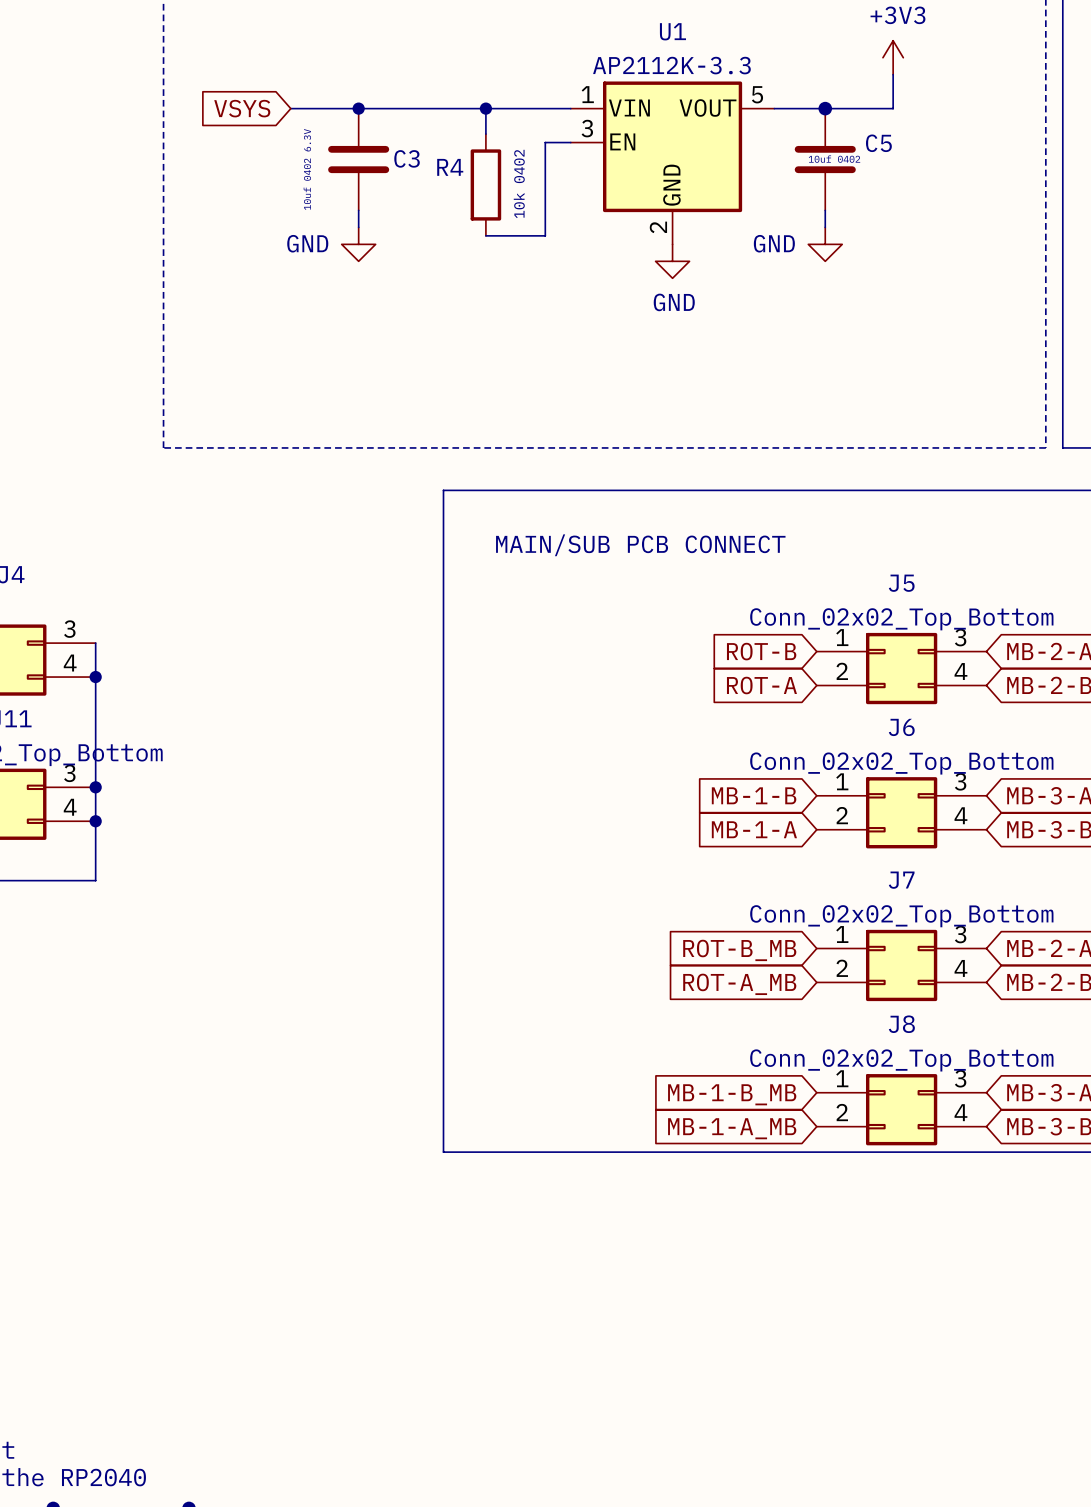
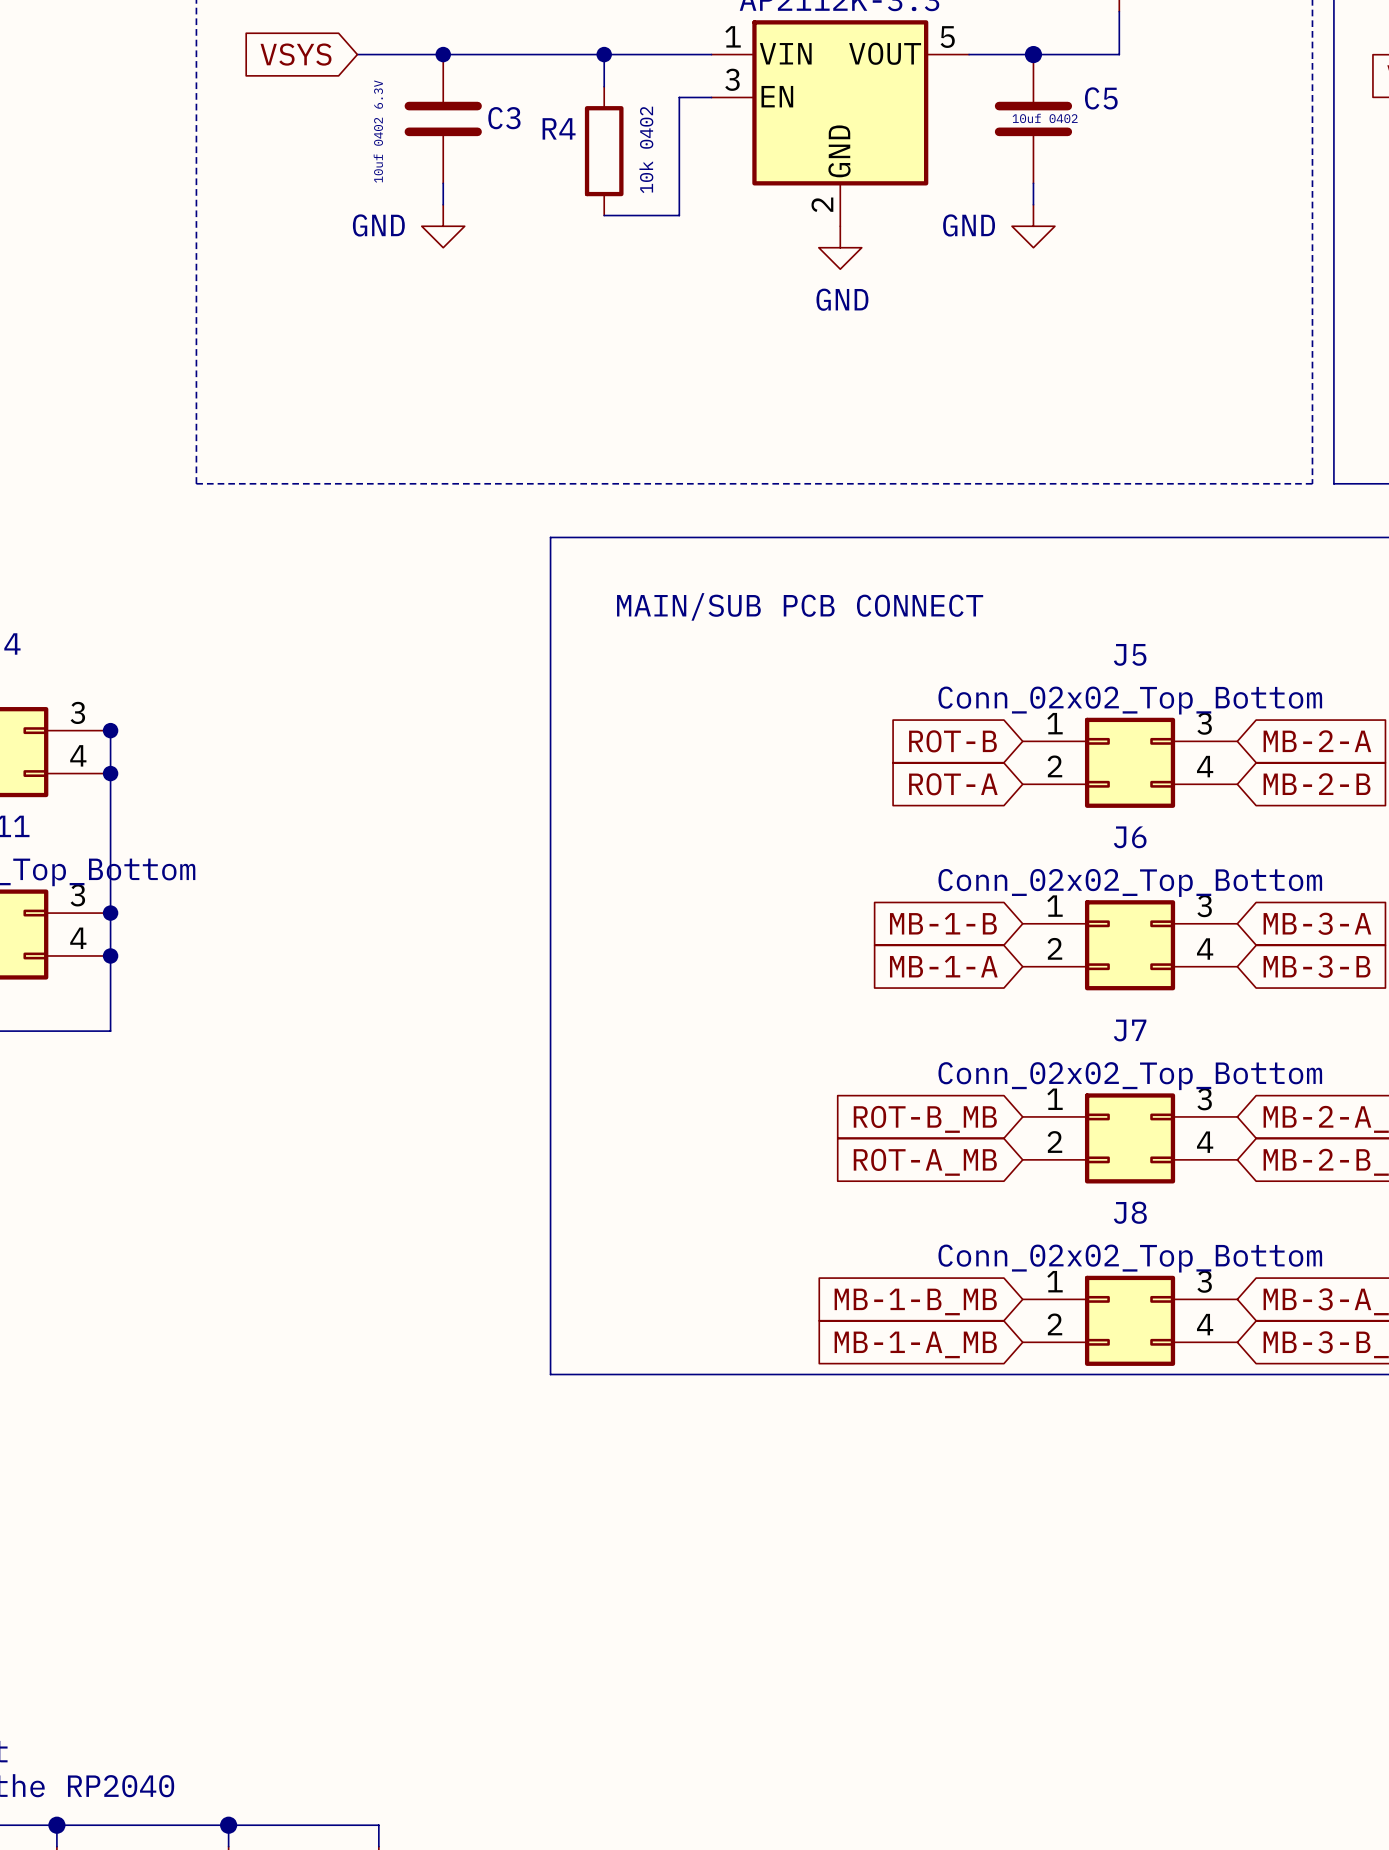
junction: none -> (110, 730)

